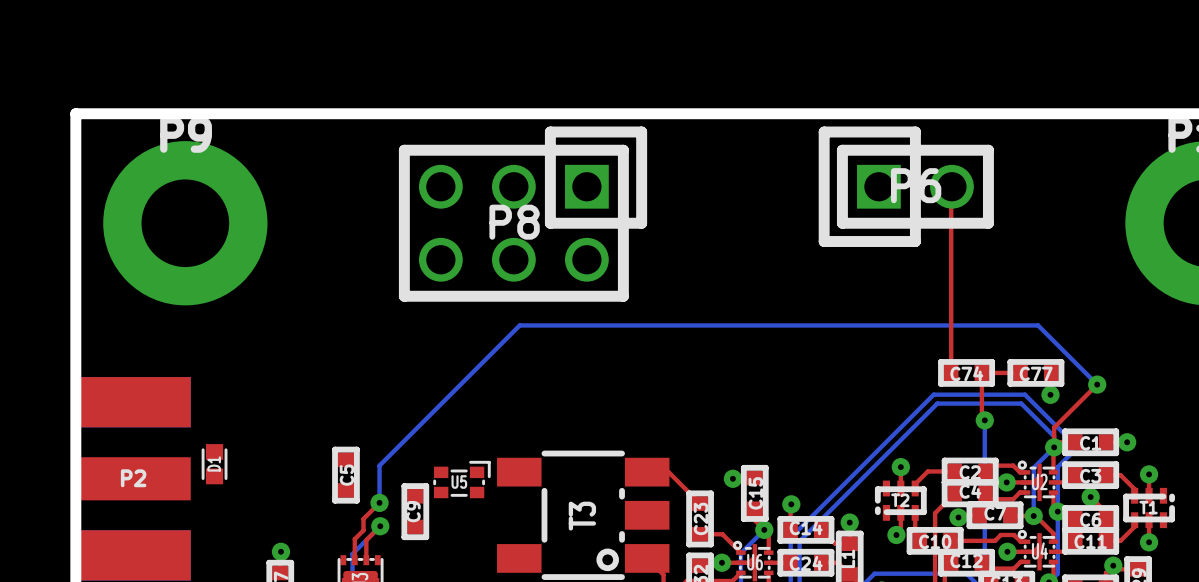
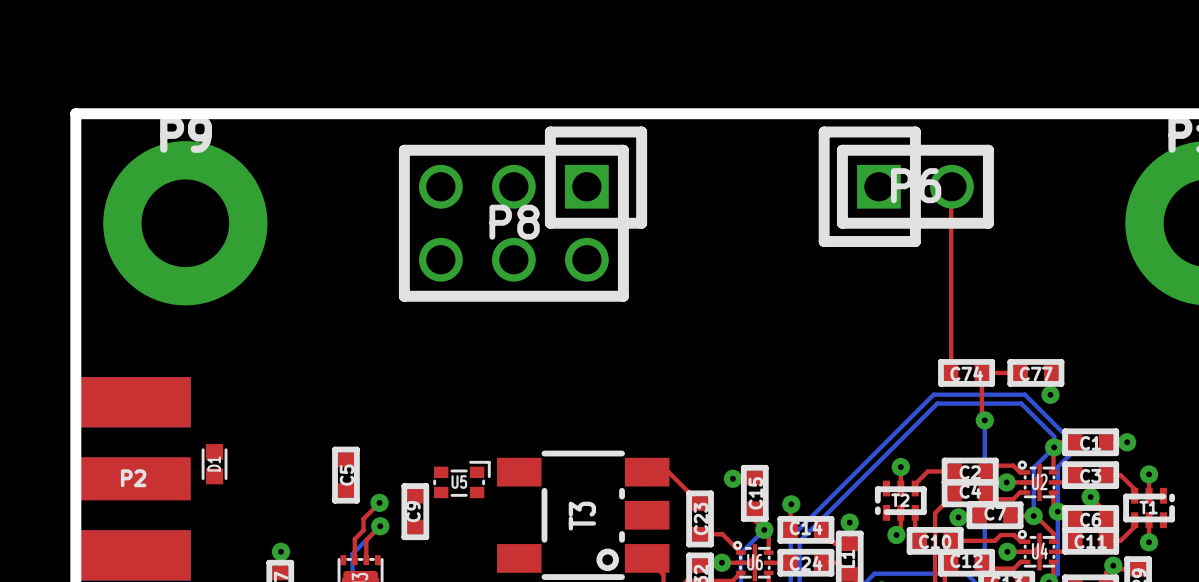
top track: (1097, 384) (1054, 427) (1054, 447) -> none
bottom track: (1097, 384) (1038, 325) (519, 325) (379, 465) (379, 502) -> none
via: (1097, 384) -> none

